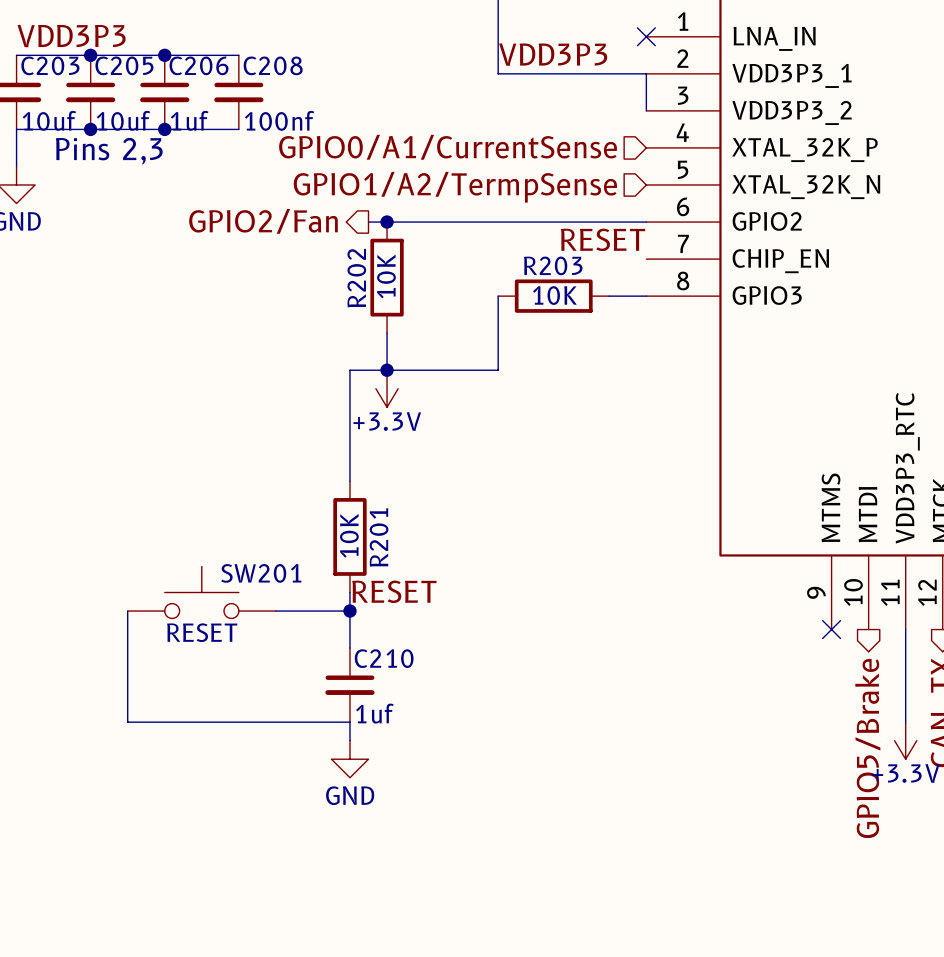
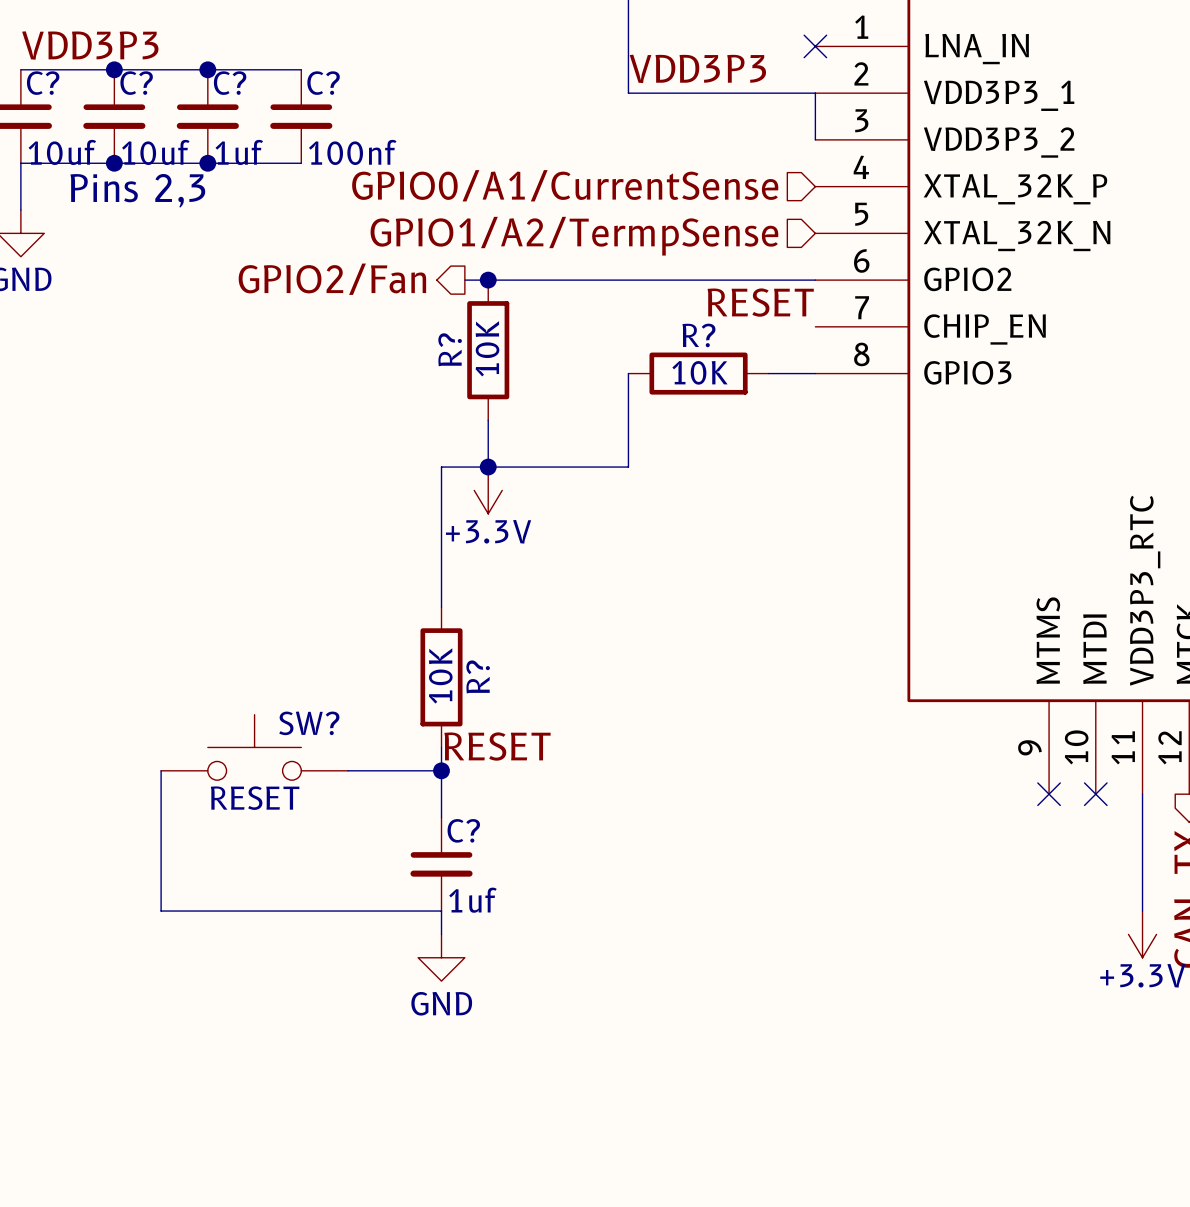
C203 name: C203 (50, 65) -> C? (43, 83)
C205 name: C205 (124, 65) -> C? (136, 83)
C206 name: C206 (199, 65) -> C? (230, 83)
C208 name: C208 (273, 65) -> C? (323, 83)
R203 name: R203 (553, 265) -> R? (698, 335)
R202 name: R202 (356, 278) -> R? (450, 349)
R201 name: R201 (379, 537) -> R? (478, 676)
SW201 name: SW201 (261, 573) -> SW? (309, 723)
no-connect mark: none -> (1095, 794)
C210 name: C210 (384, 658) -> C? (463, 830)
hierarchical label: GPIO5/Brake (867, 748) -> none

